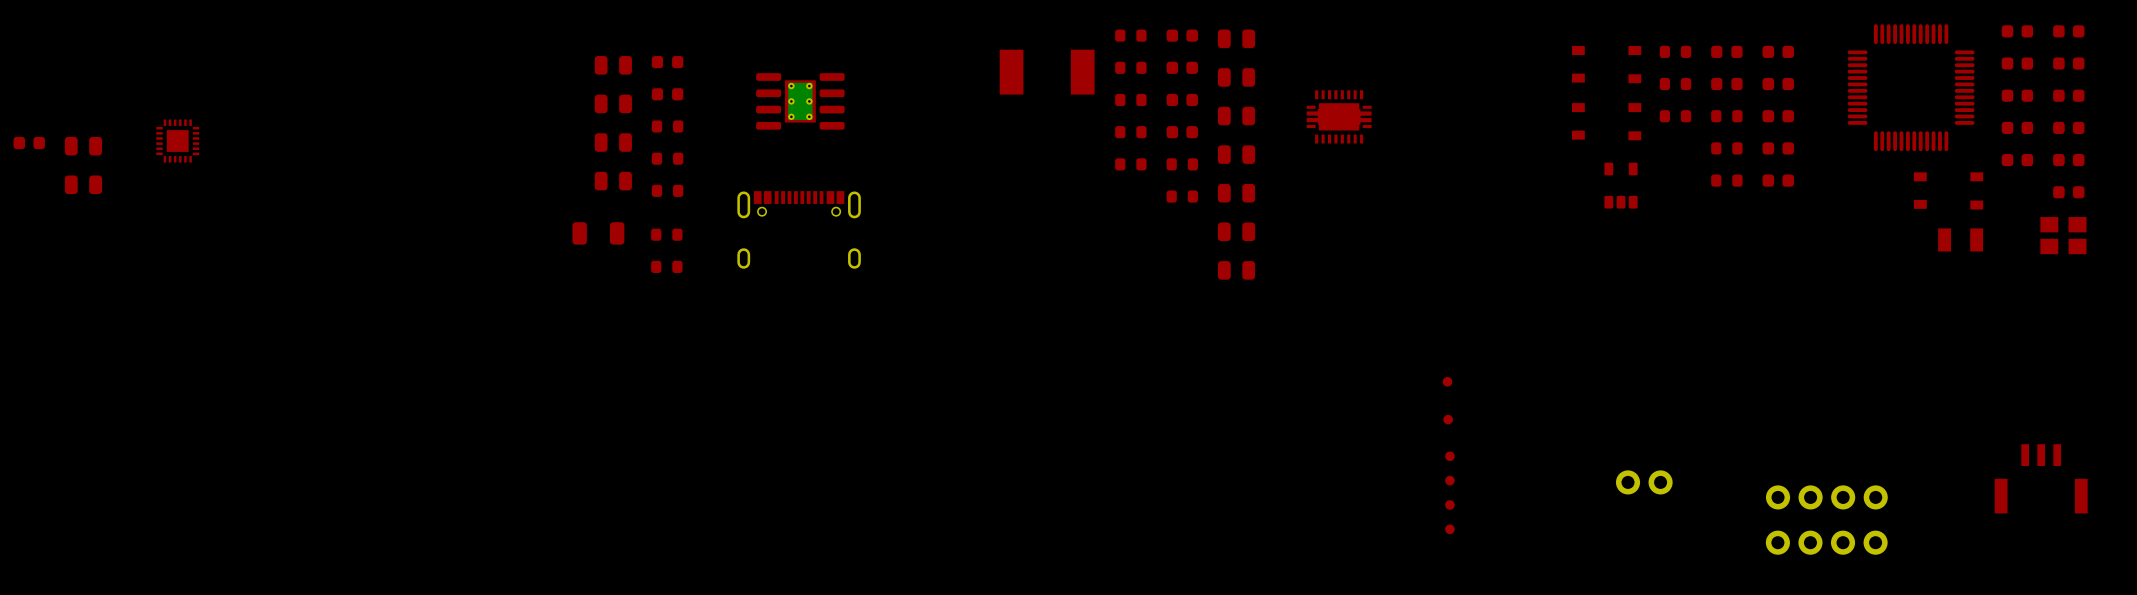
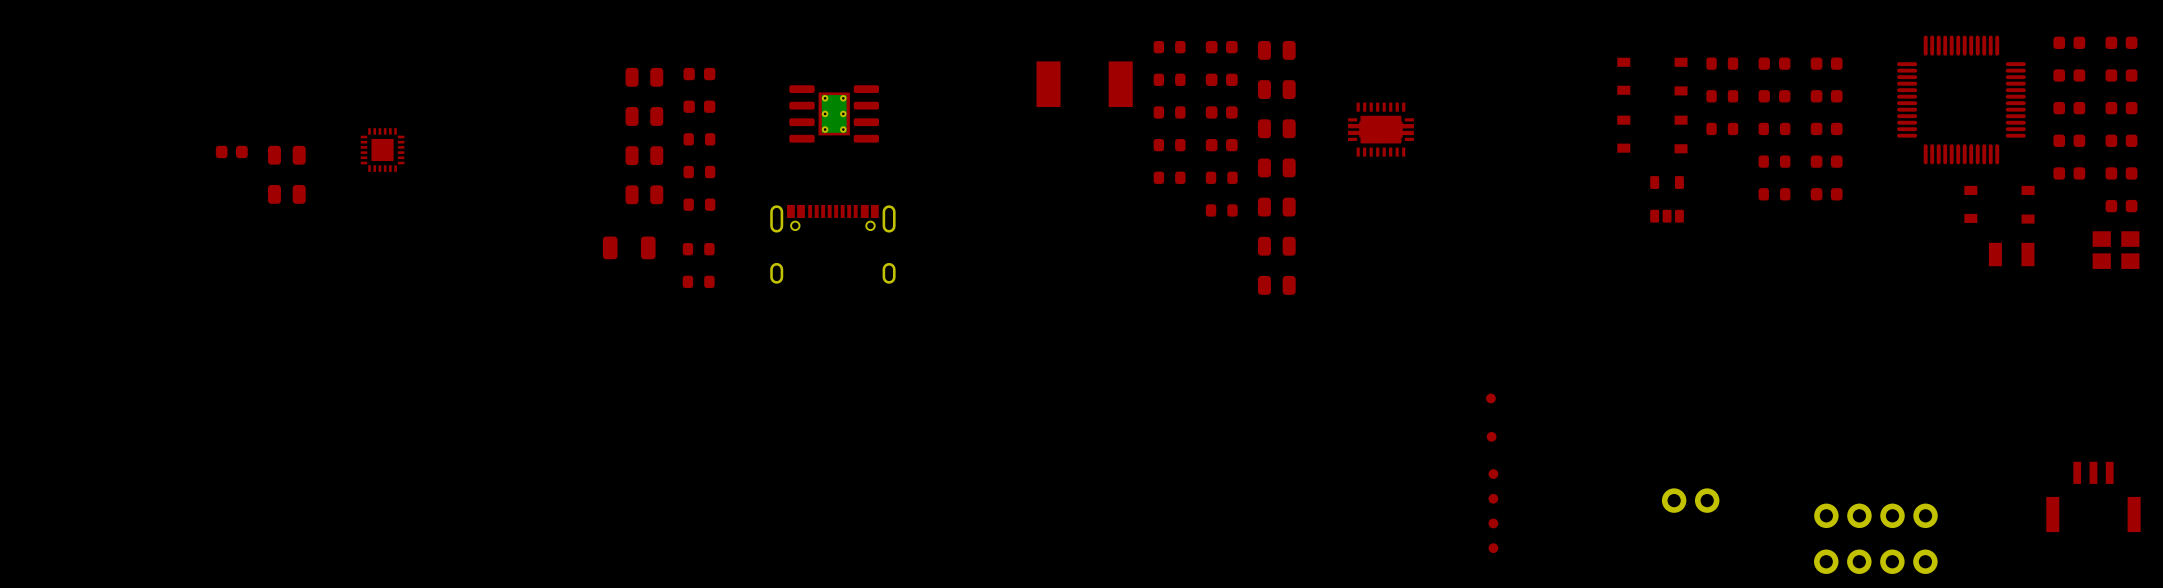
part position: (177, 141) -> (382, 149)
part position: (29, 142) -> (231, 151)
part: none -> (286, 155)
part: (83, 146) -> none
part: none -> (286, 194)
part: (83, 184) -> none

